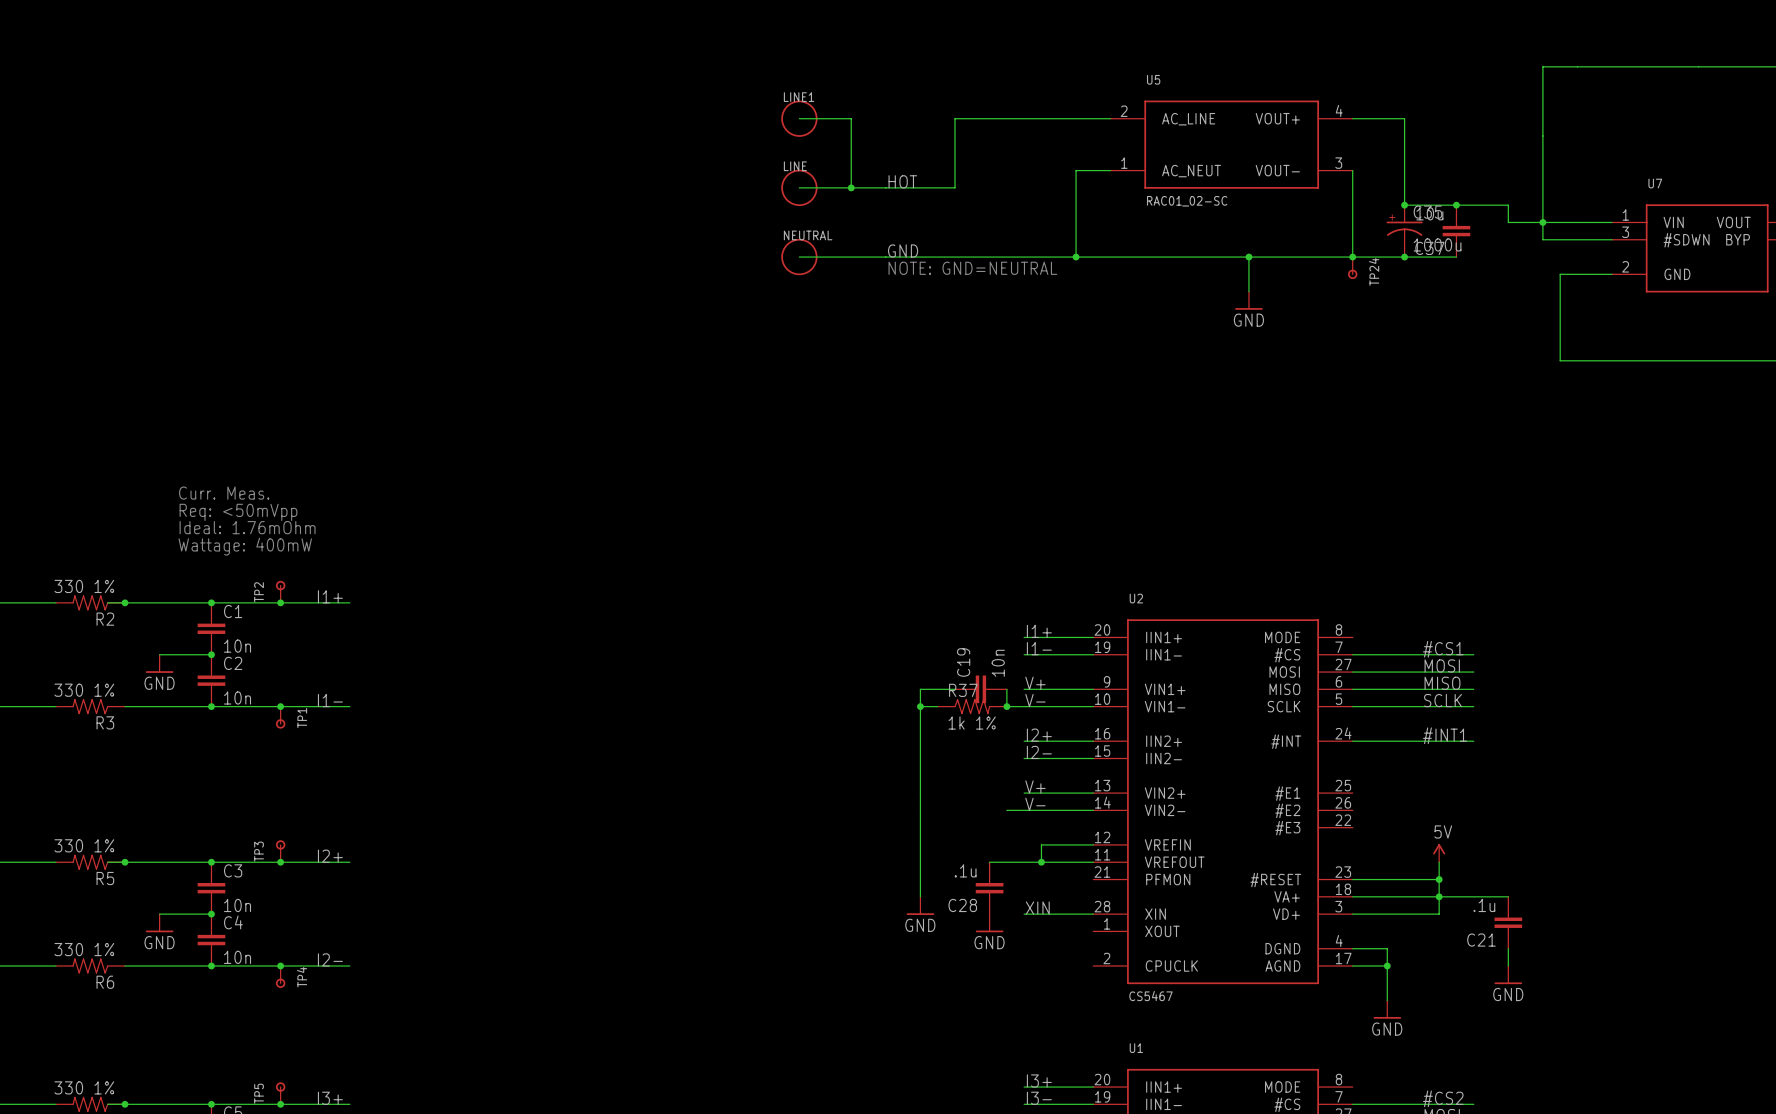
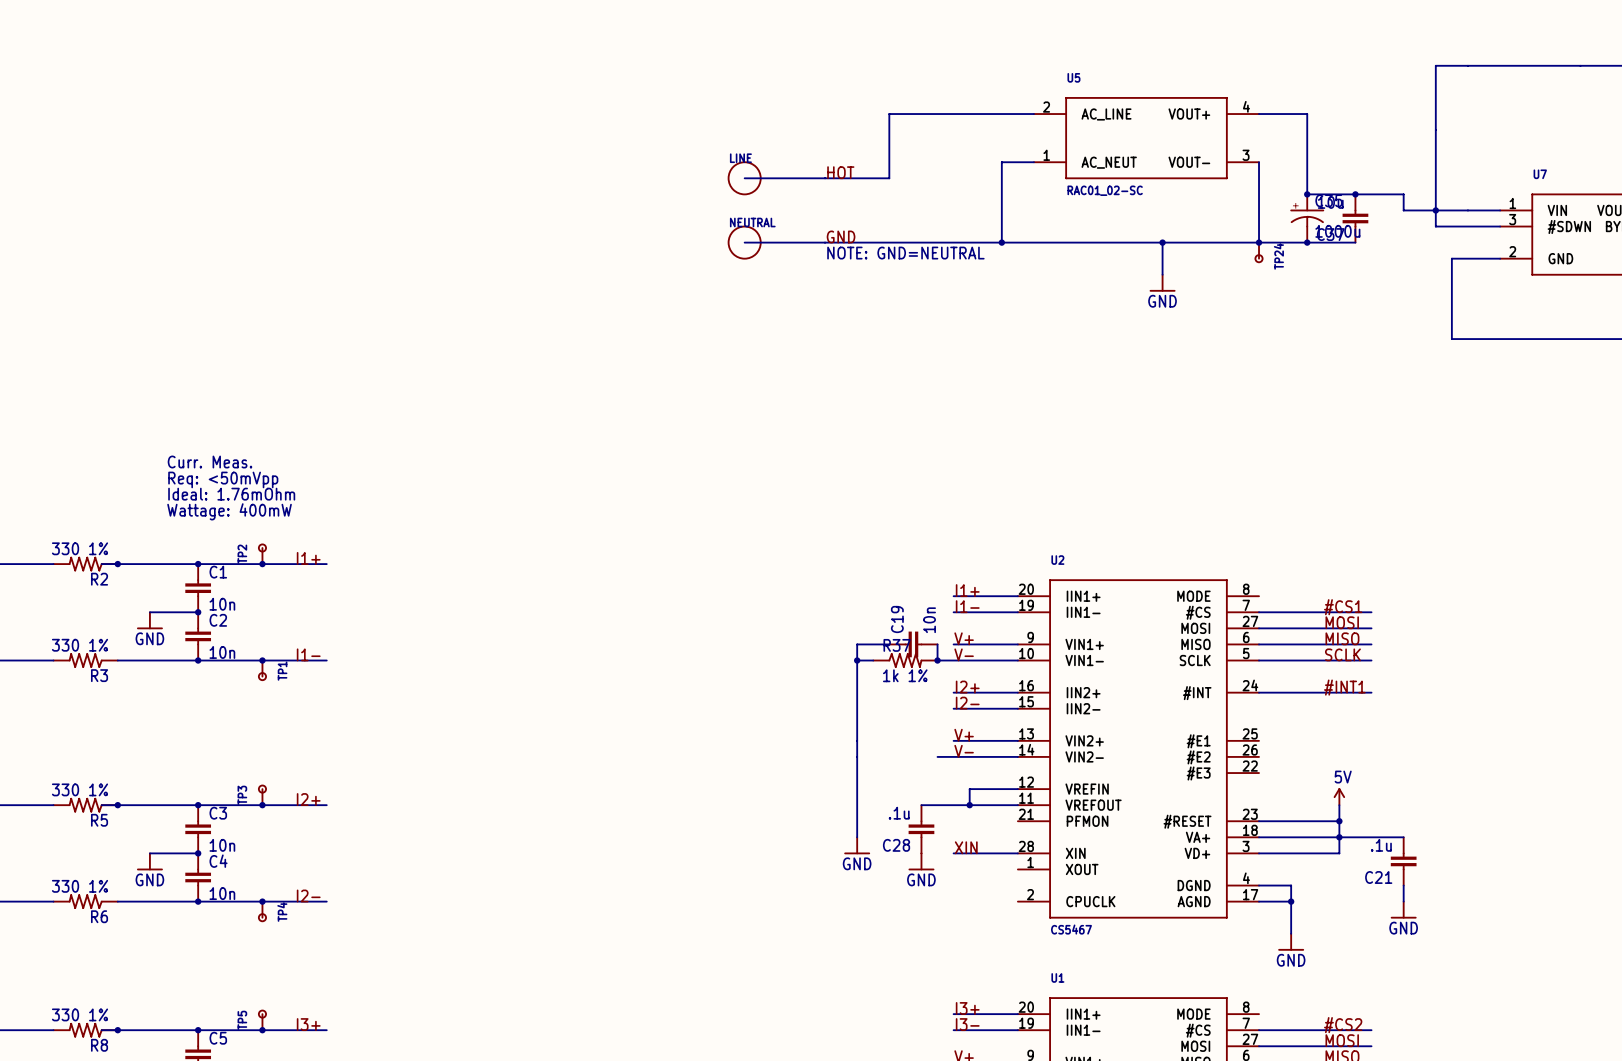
wire: (799, 118) (851, 118) (851, 187) -> none
LINE1: (799, 118) -> none
junction: (851, 187) -> none

